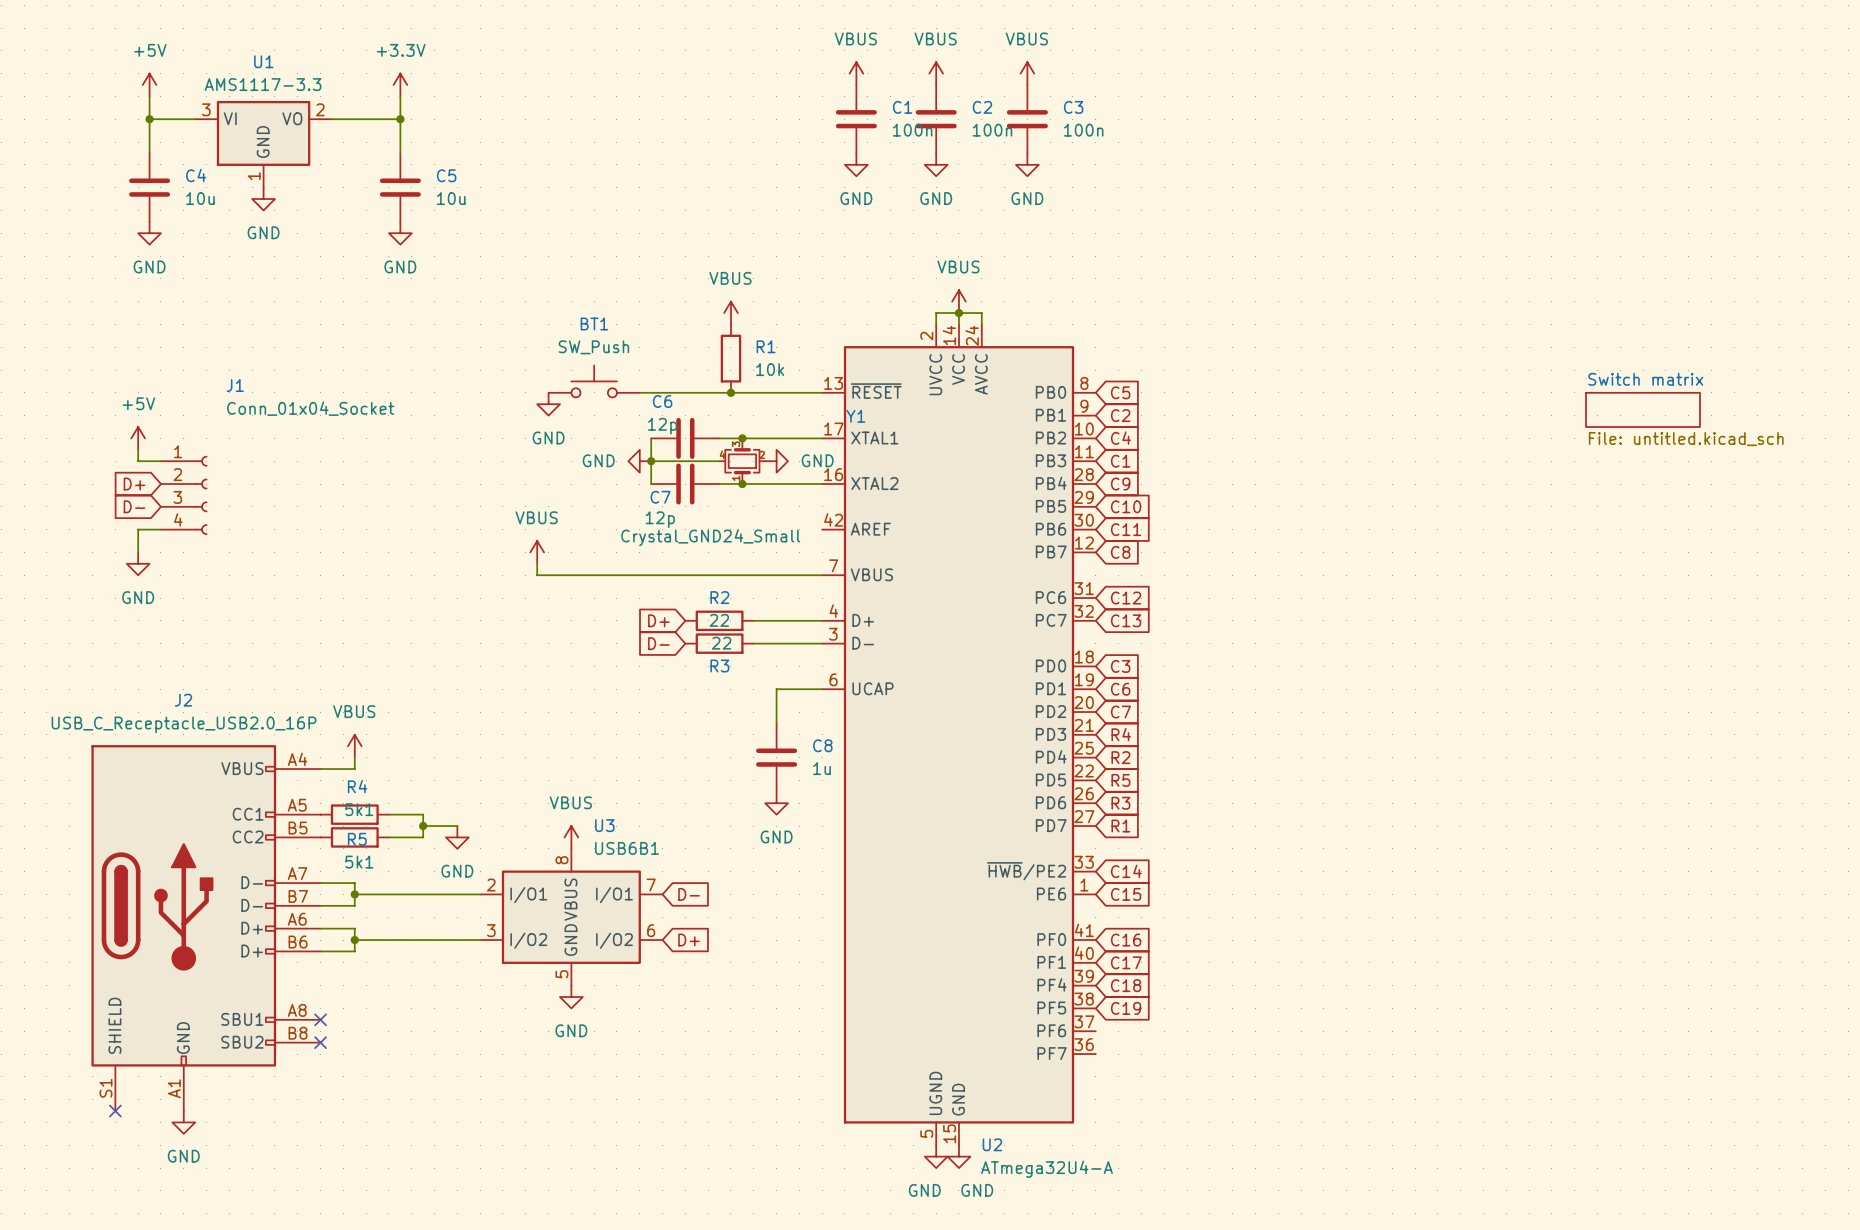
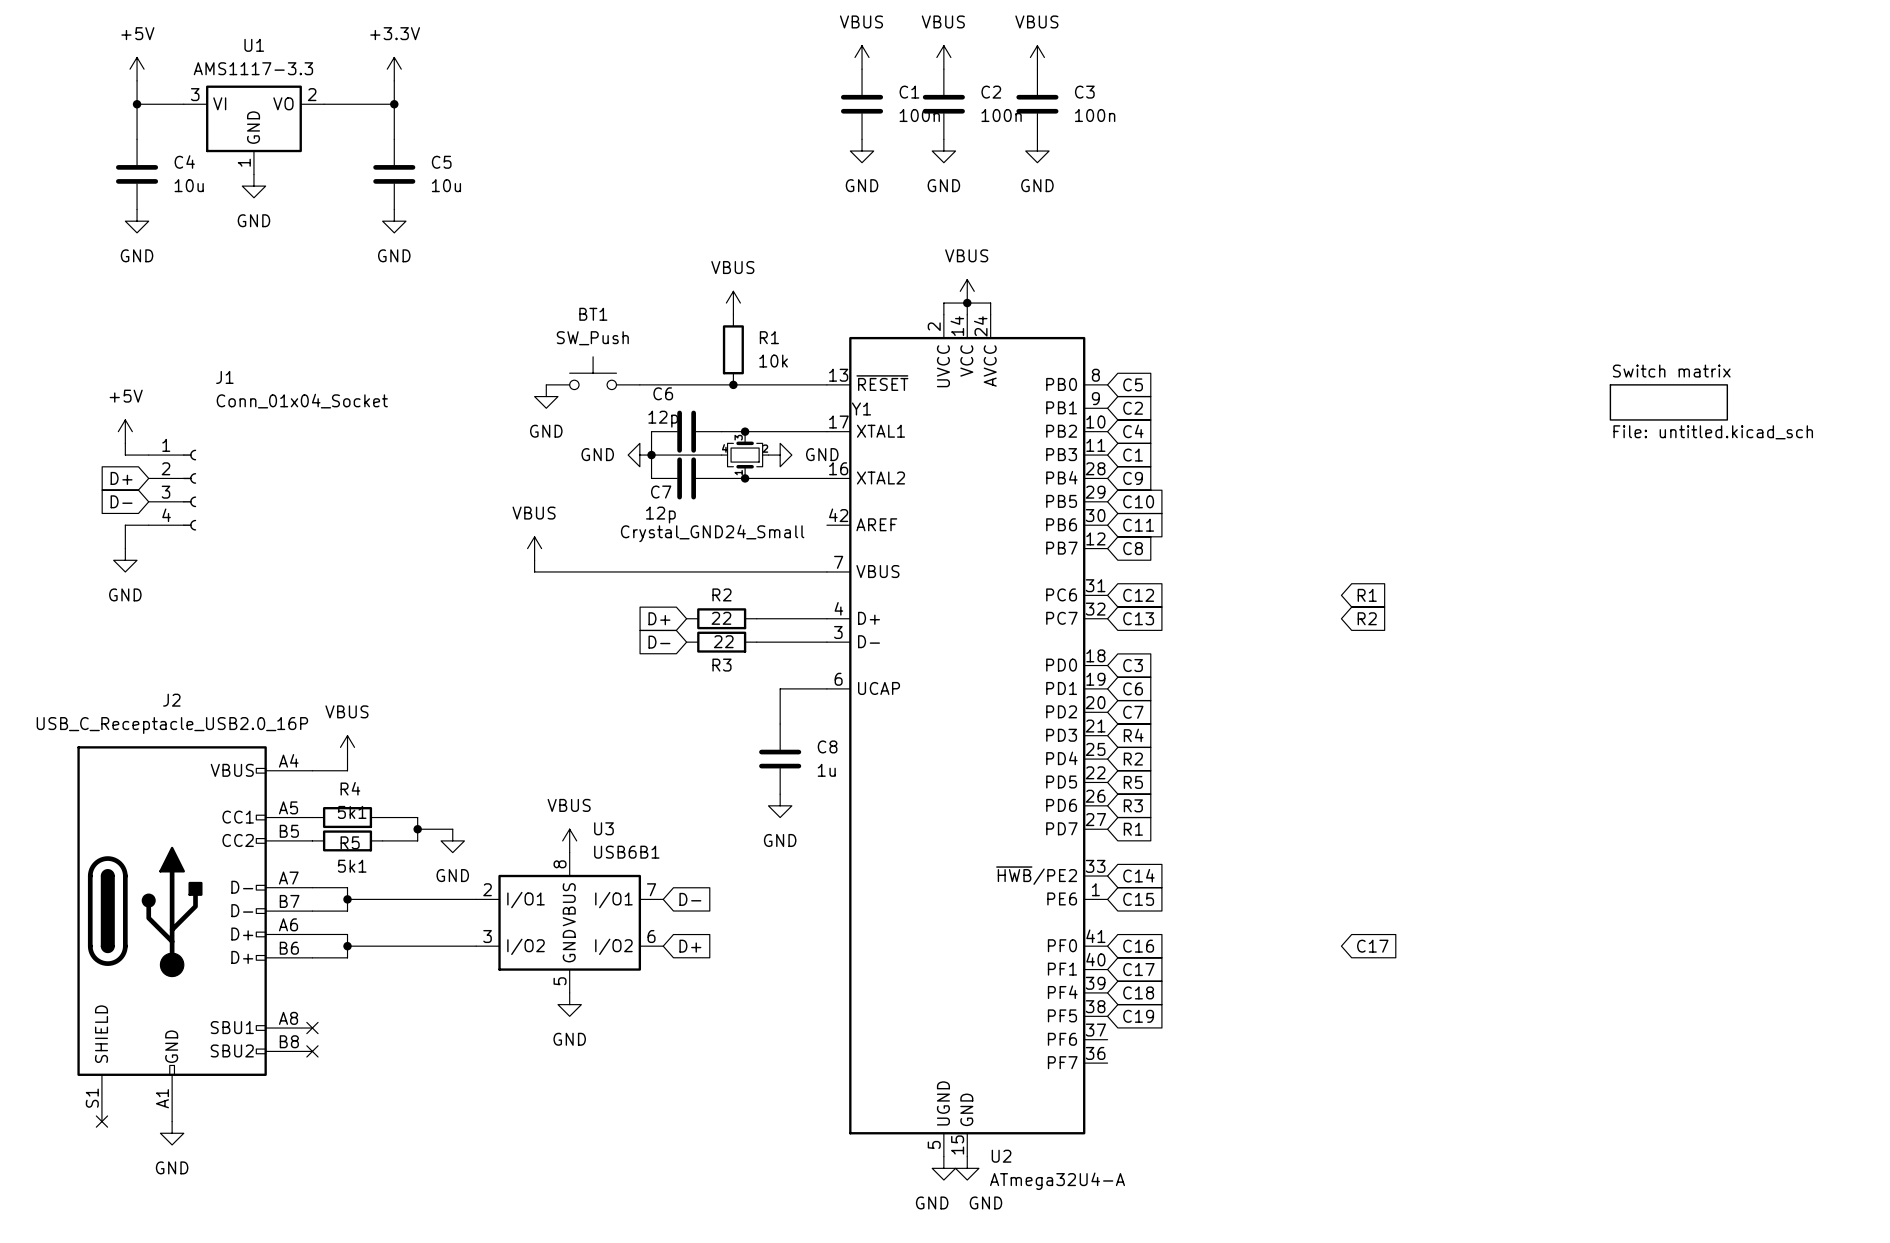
global label: none -> R1 (1367, 595)
global label: none -> R2 (1367, 618)
global label: none -> C17 (1372, 946)

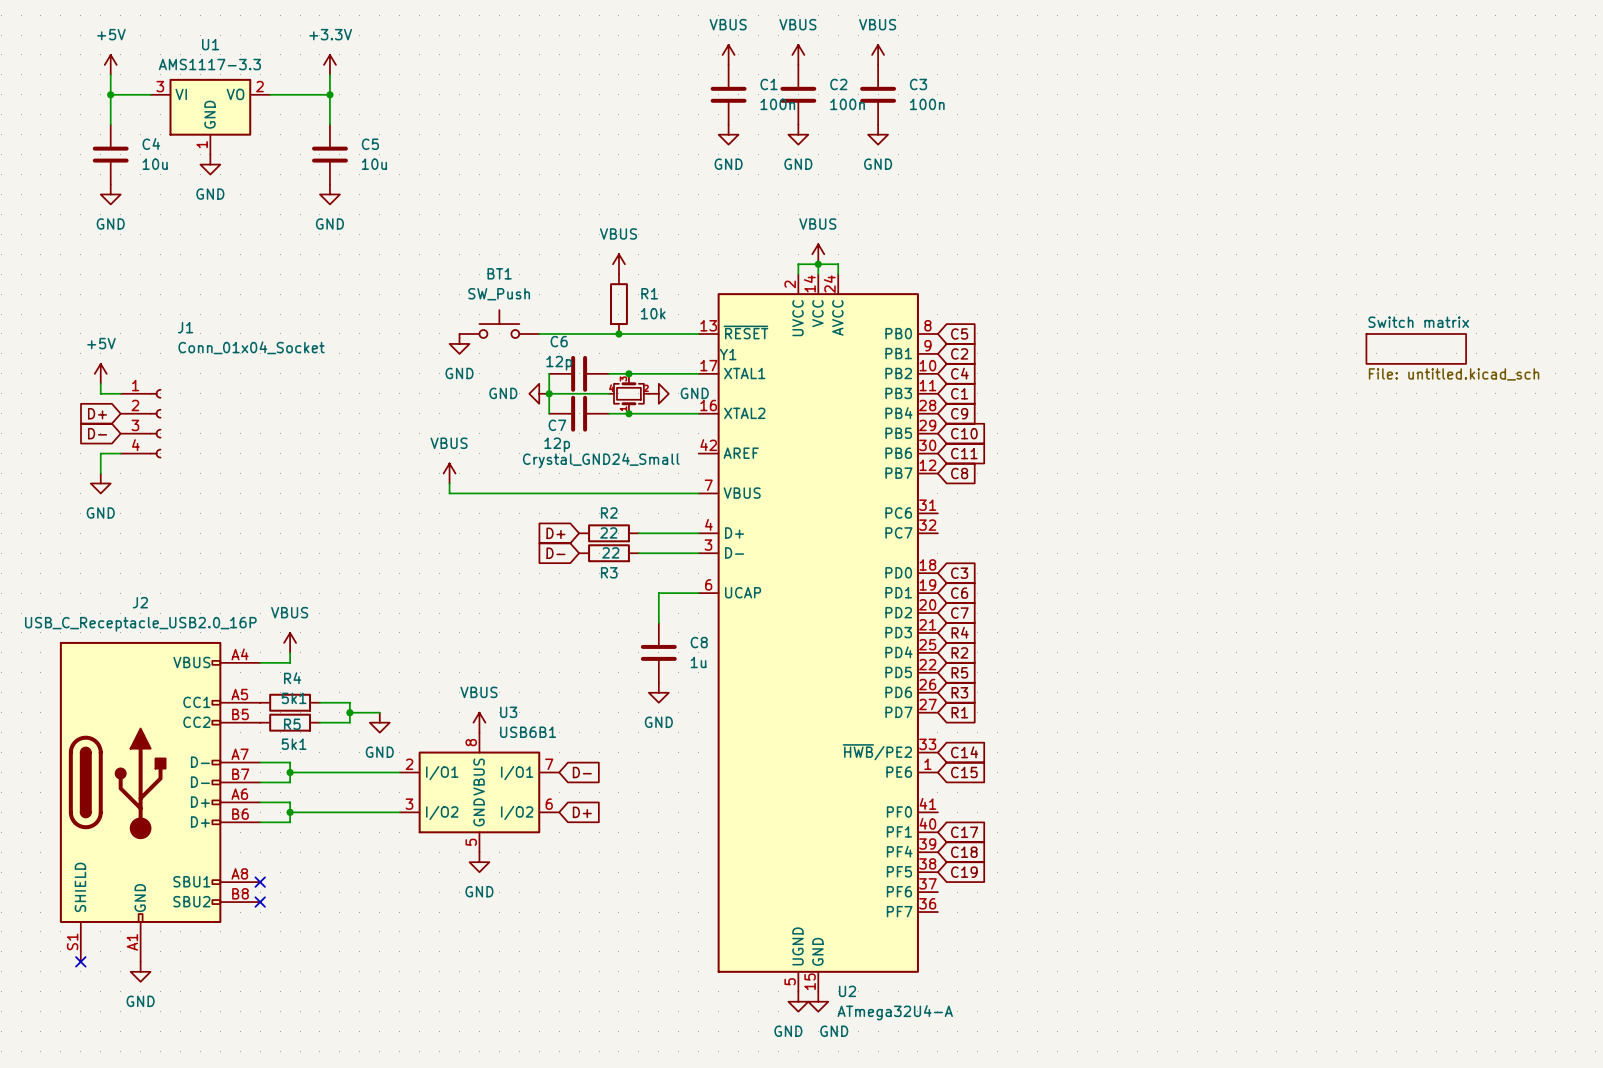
global label: C12 (1138, 595) -> none
global label: R1 (1367, 595) -> none
global label: C13 (1138, 618) -> none
global label: R2 (1367, 618) -> none
global label: C16 (1138, 946) -> none
global label: C17 (1372, 946) -> none

